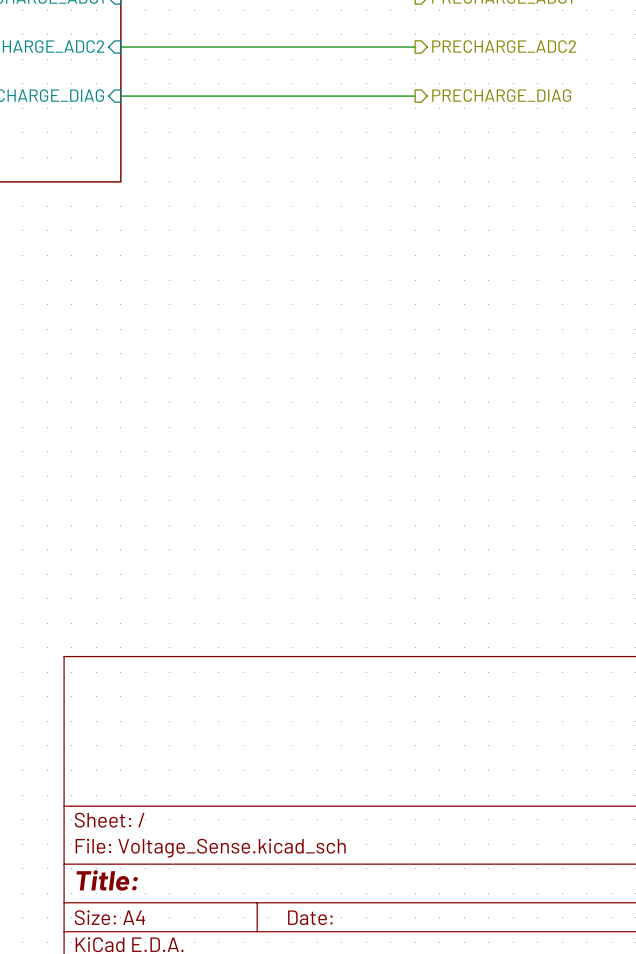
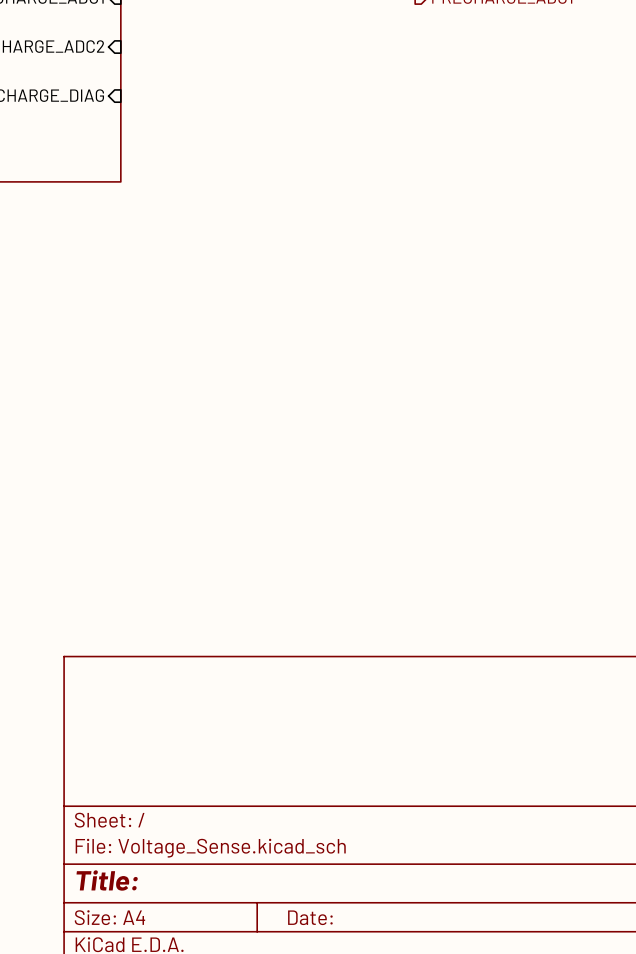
hierarchical label: PRECHARGE_ADC2 (504, 46) -> none
wire: (120, 47) (415, 47) -> none
hierarchical label: PRECHARGE_DIAG (501, 95) -> none
wire: (120, 96) (415, 96) -> none

